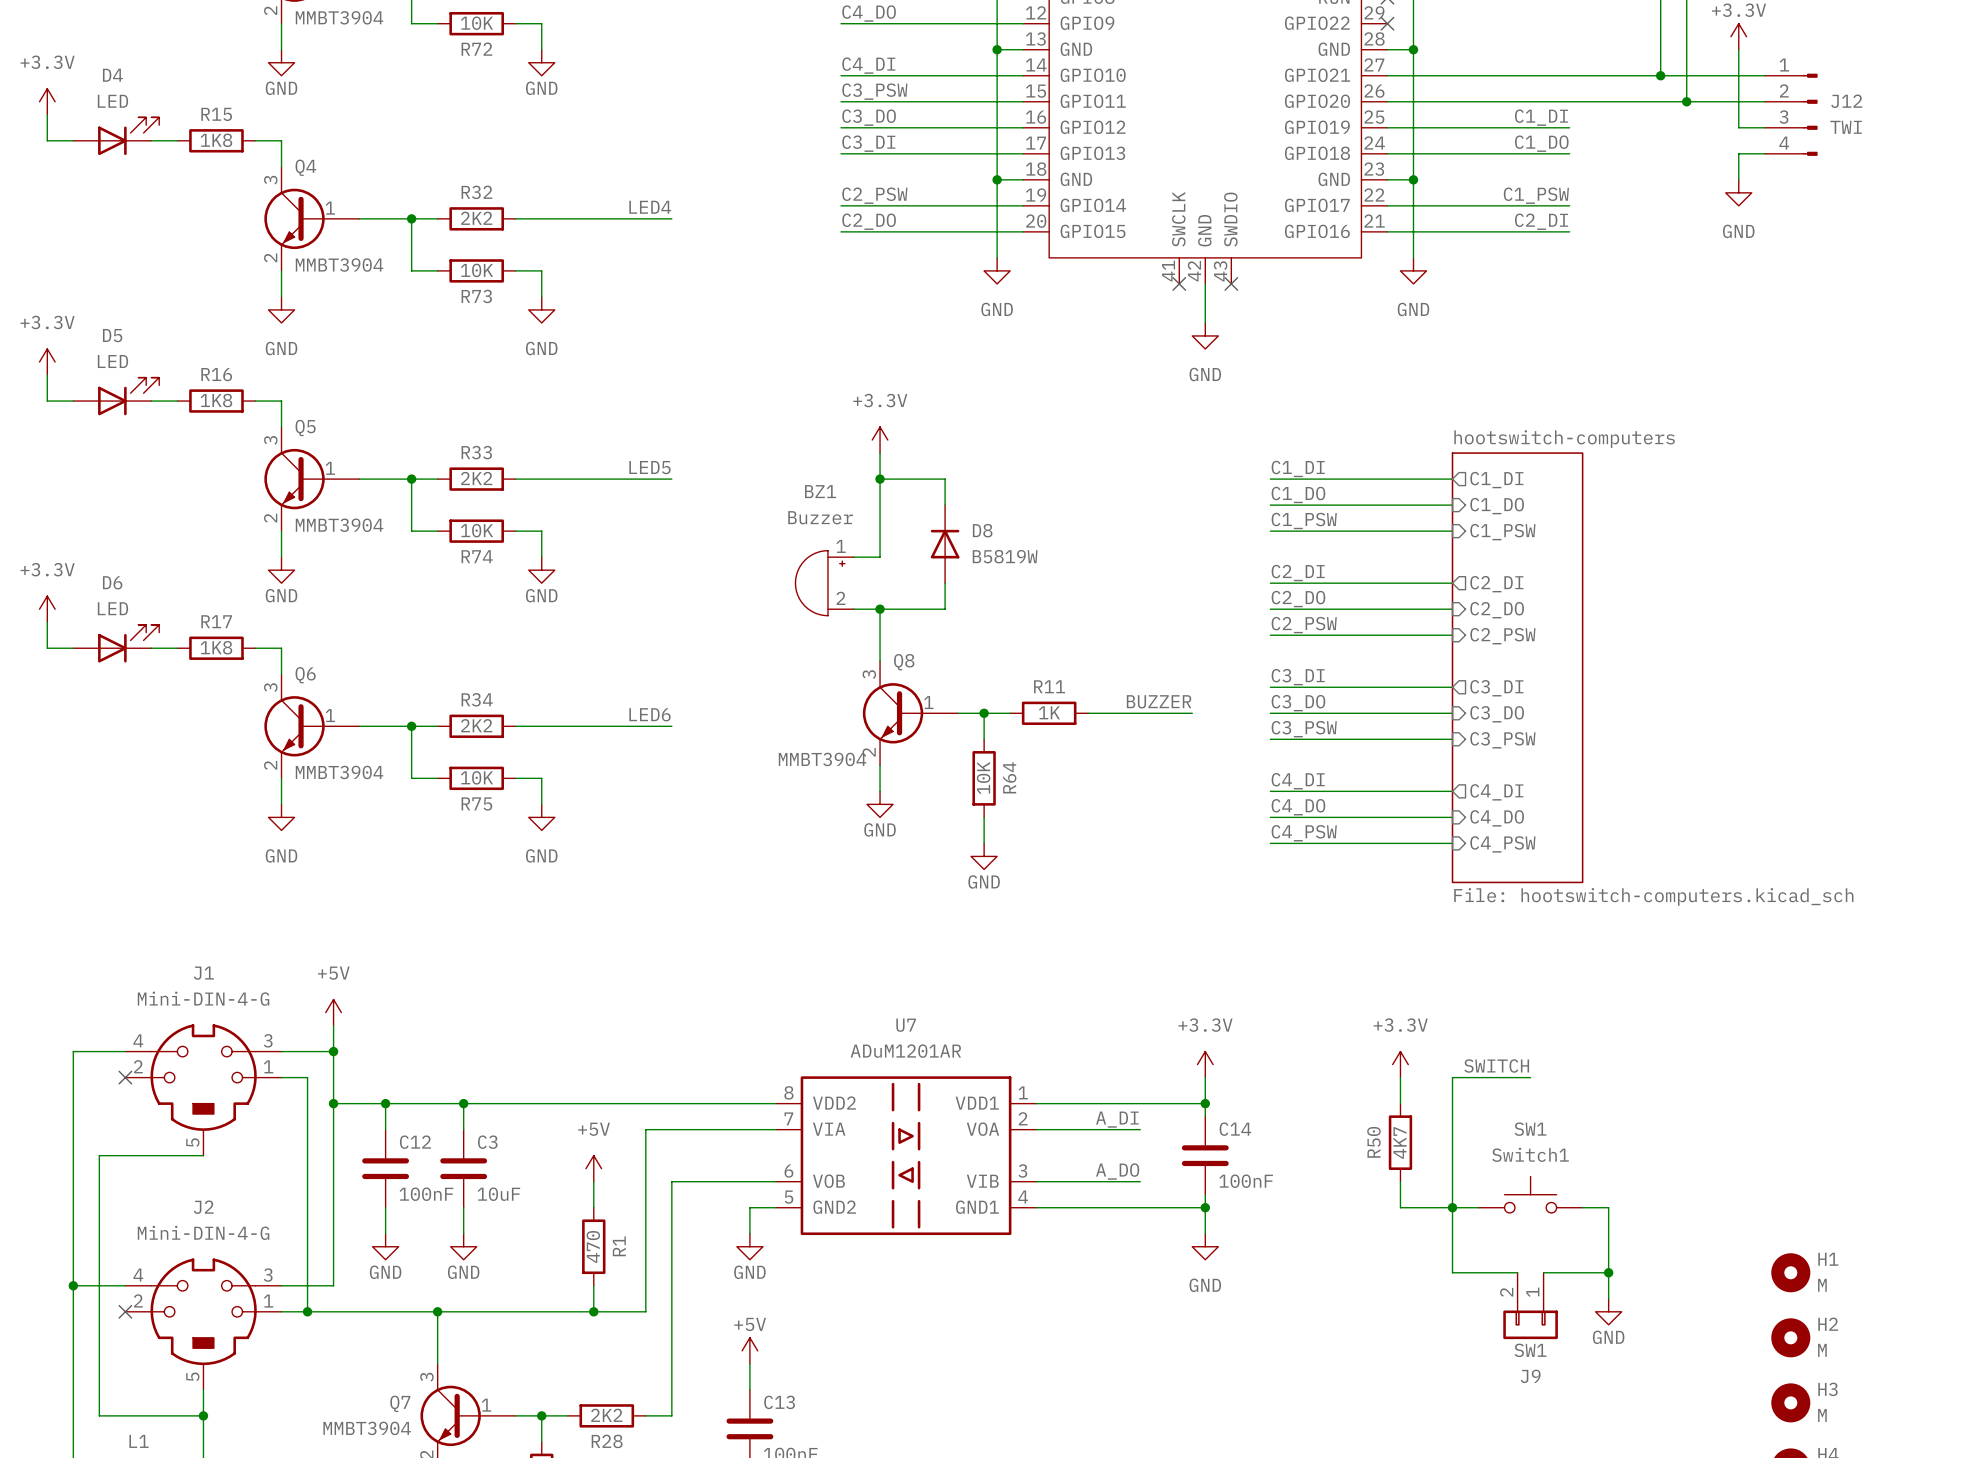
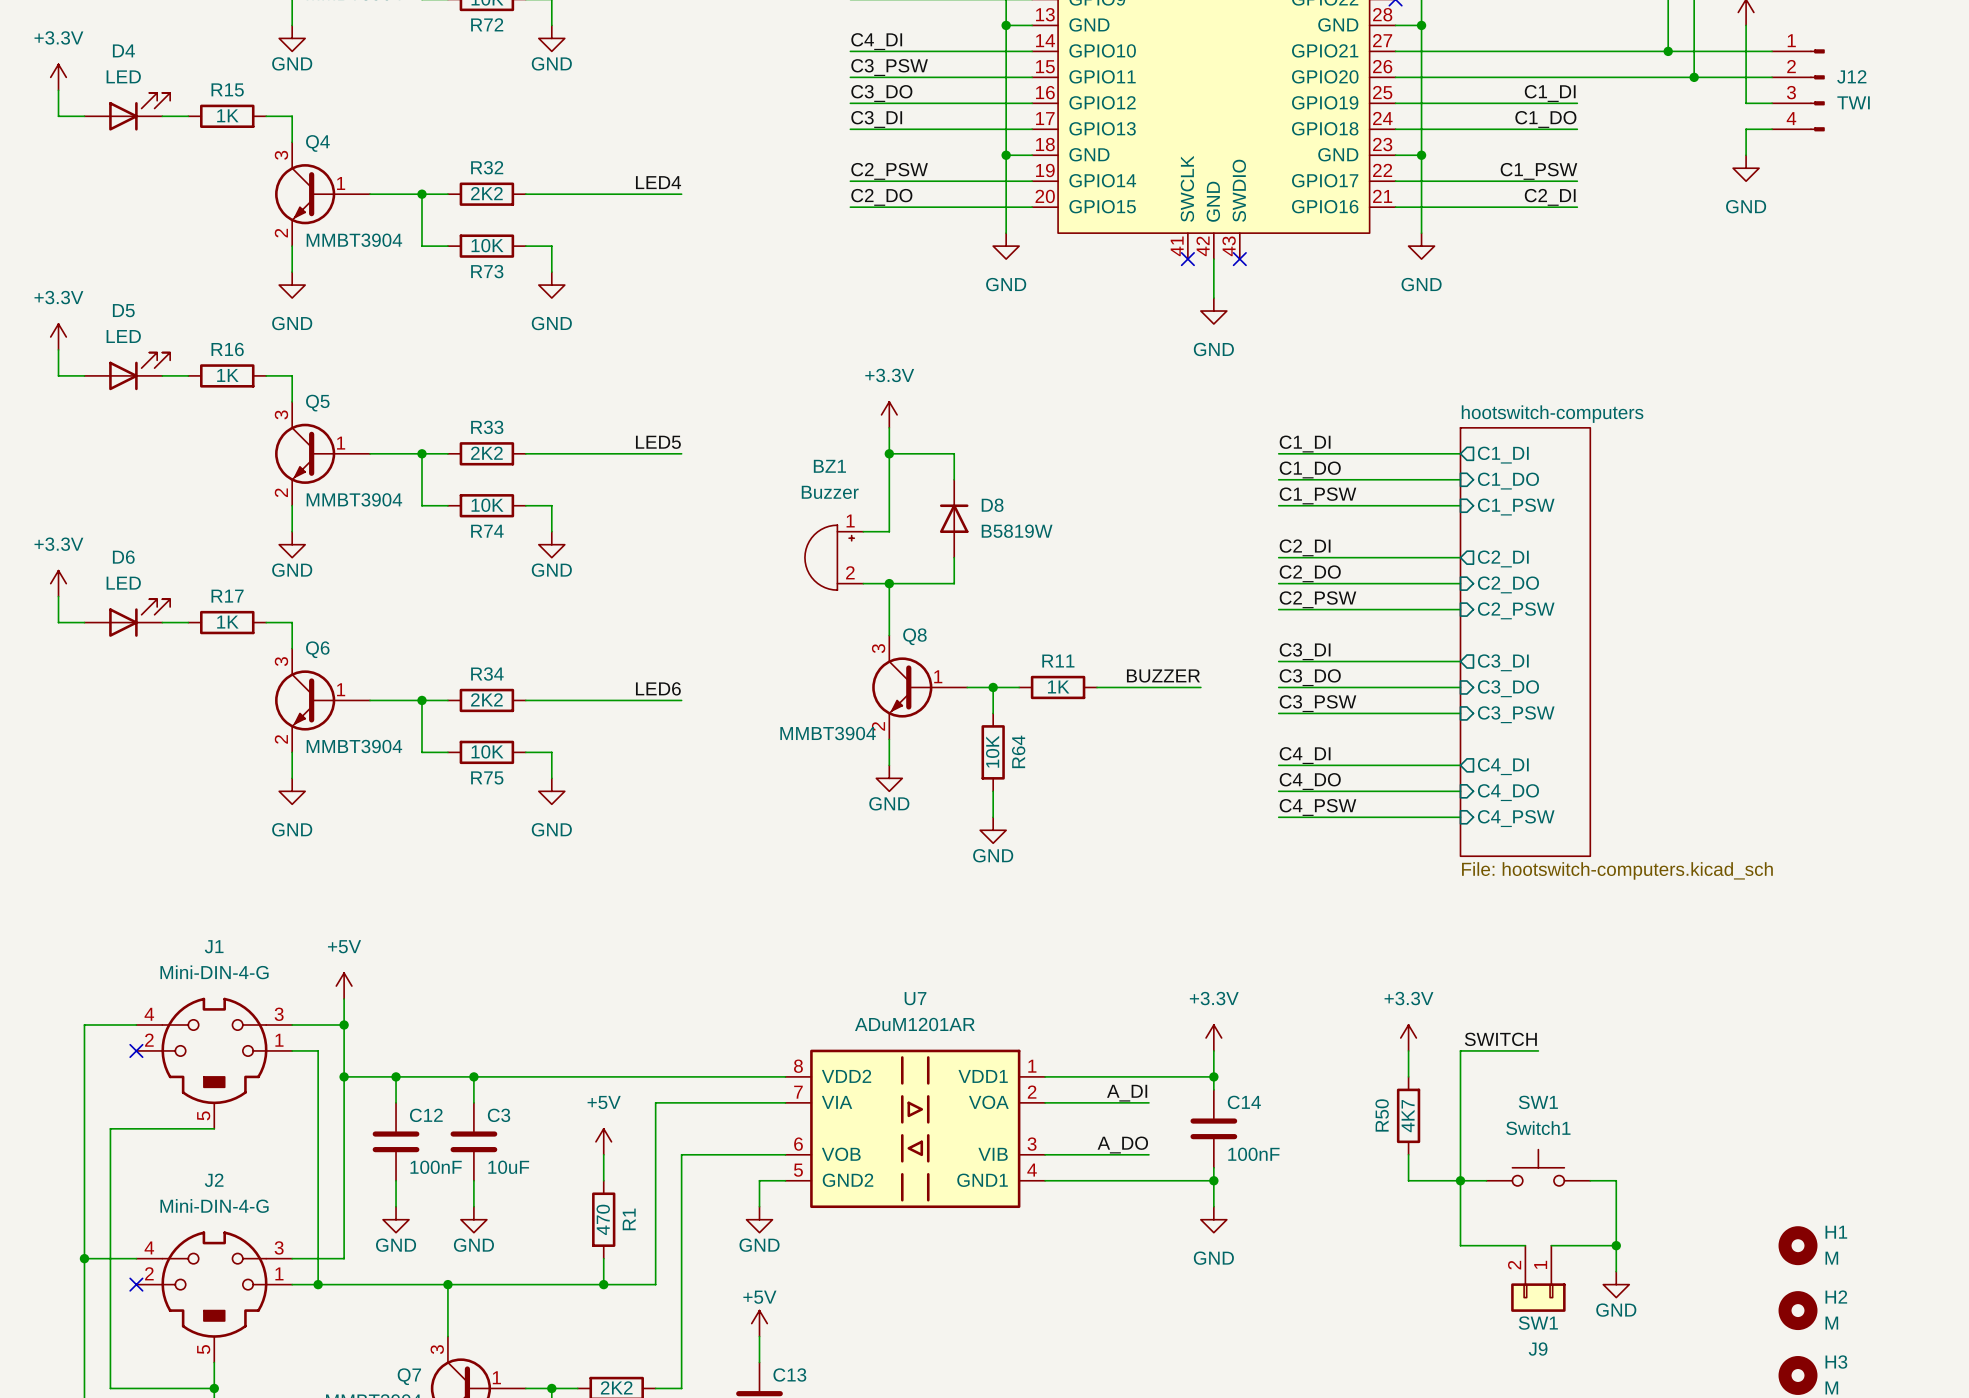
R15 value: 1K8 (216, 140) -> 1K (227, 115)
R16 value: 1K8 (216, 400) -> 1K (227, 375)
R17 value: 1K8 (216, 647) -> 1K (227, 622)

